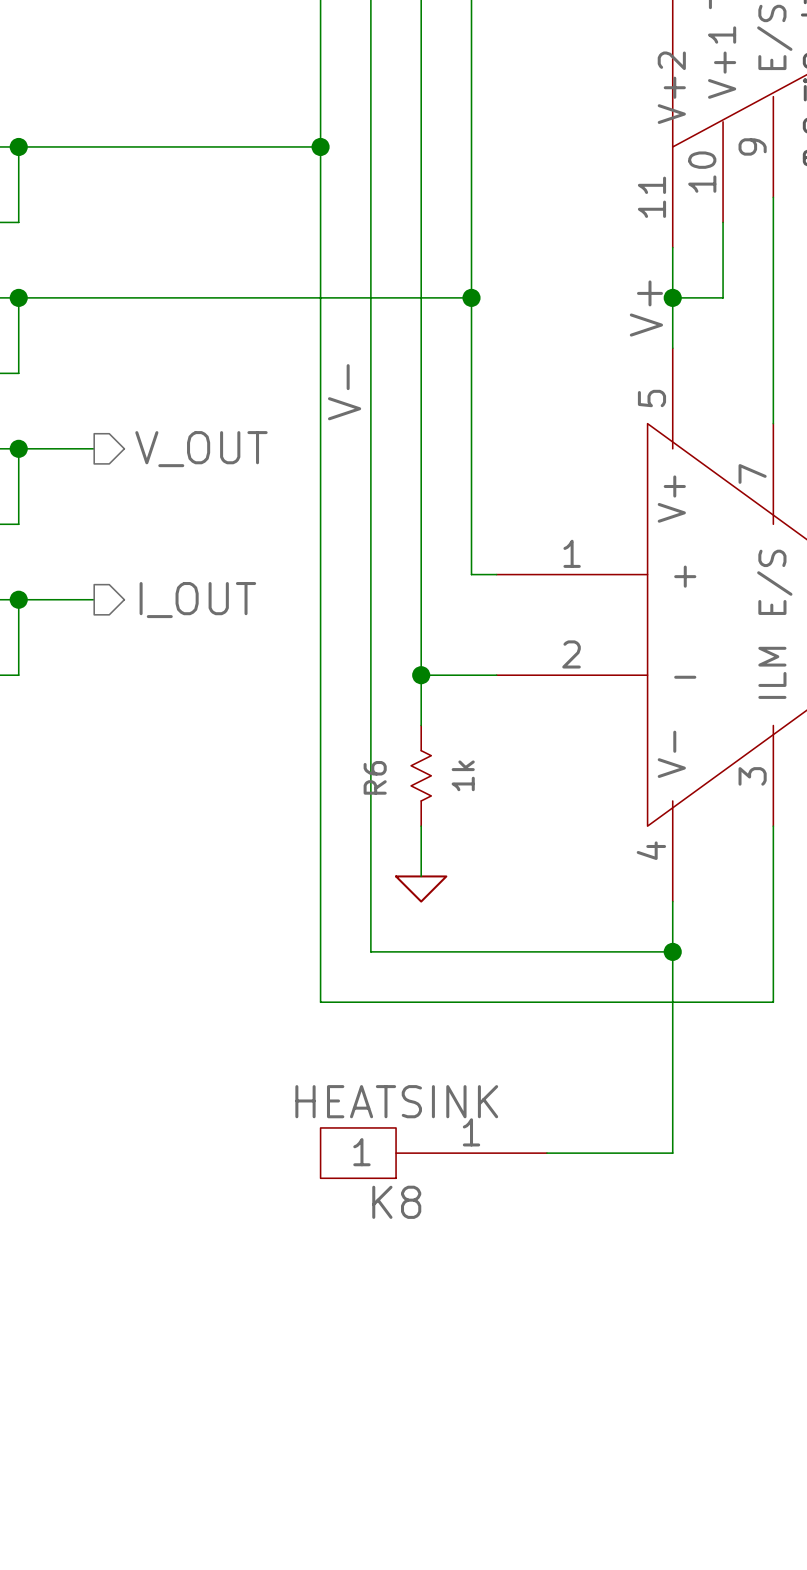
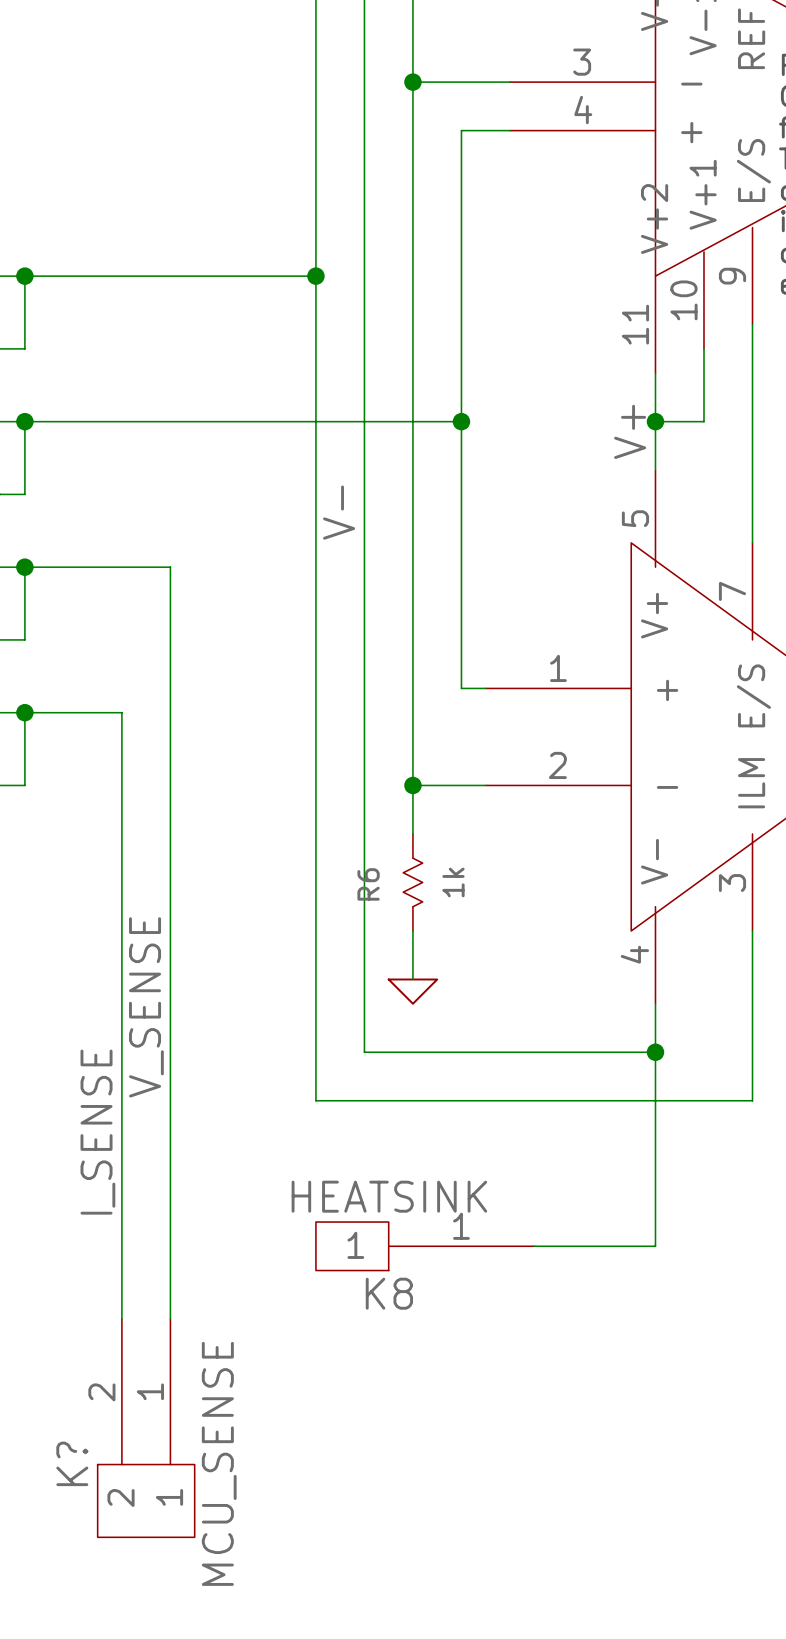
wire: none -> (97, 567) (170, 567) (170, 1319)
hierarchical label: V_OUT (201, 449) -> none
wire: none -> (97, 712) (121, 712) (121, 1319)
hierarchical label: I_OUT (197, 600) -> none
label: none -> V_SENSE (146, 1007)
label: none -> I_SENSE (97, 1132)
K?: none -> MCU_SENSE (146, 1428)

